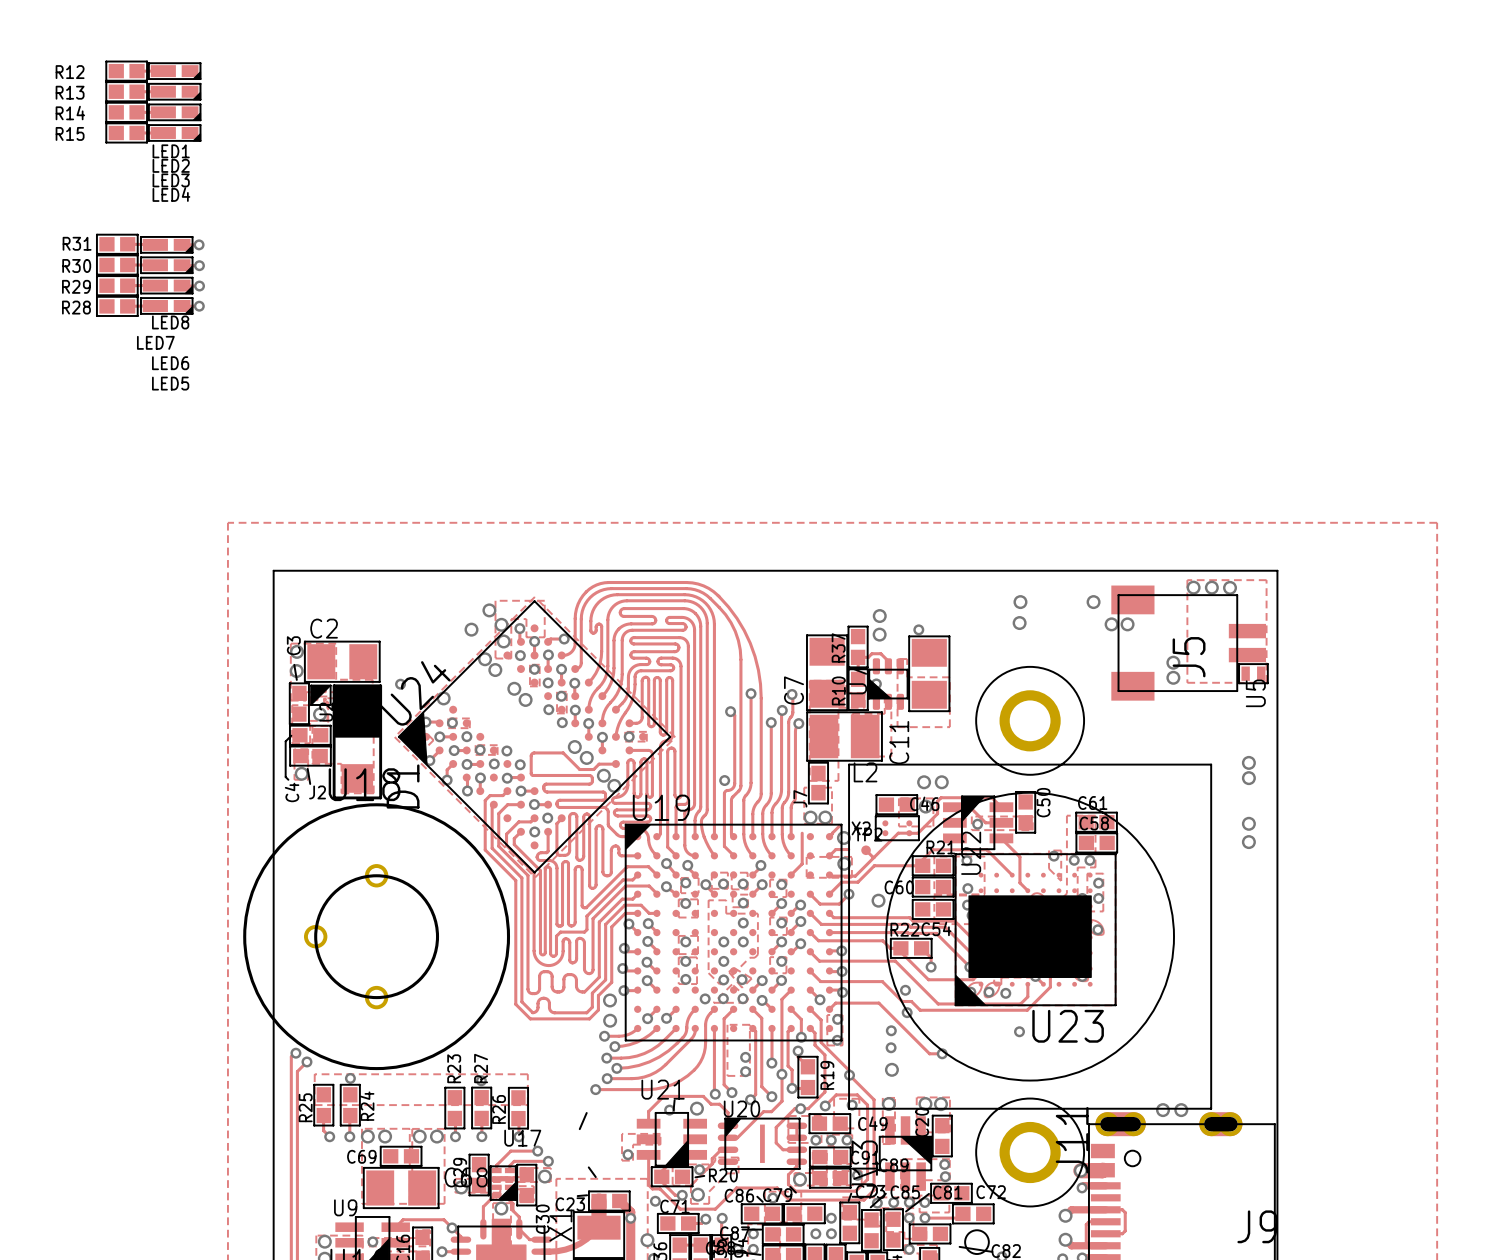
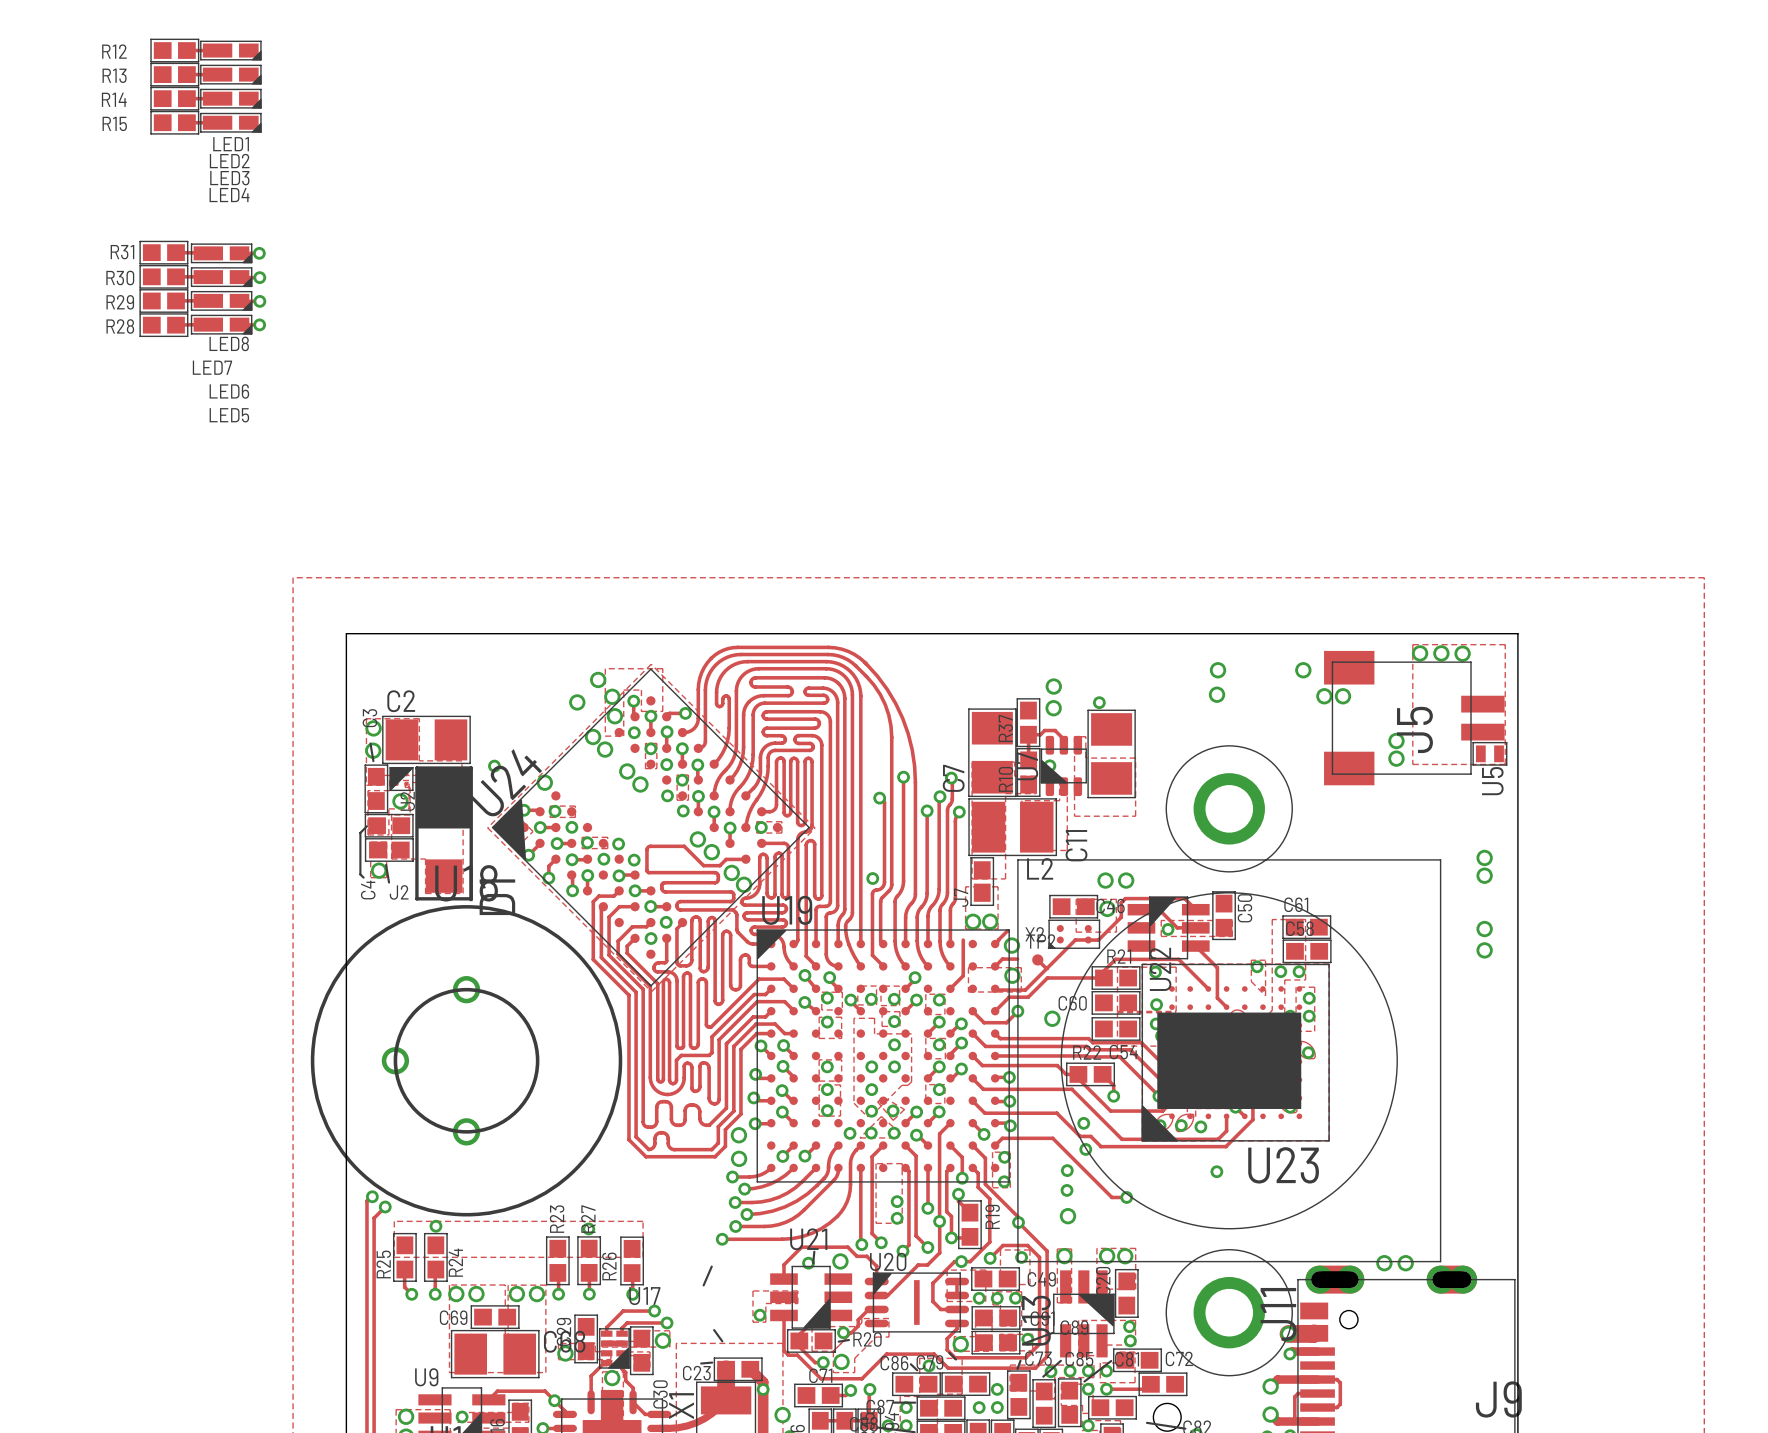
via: (655, 1201) -> none

